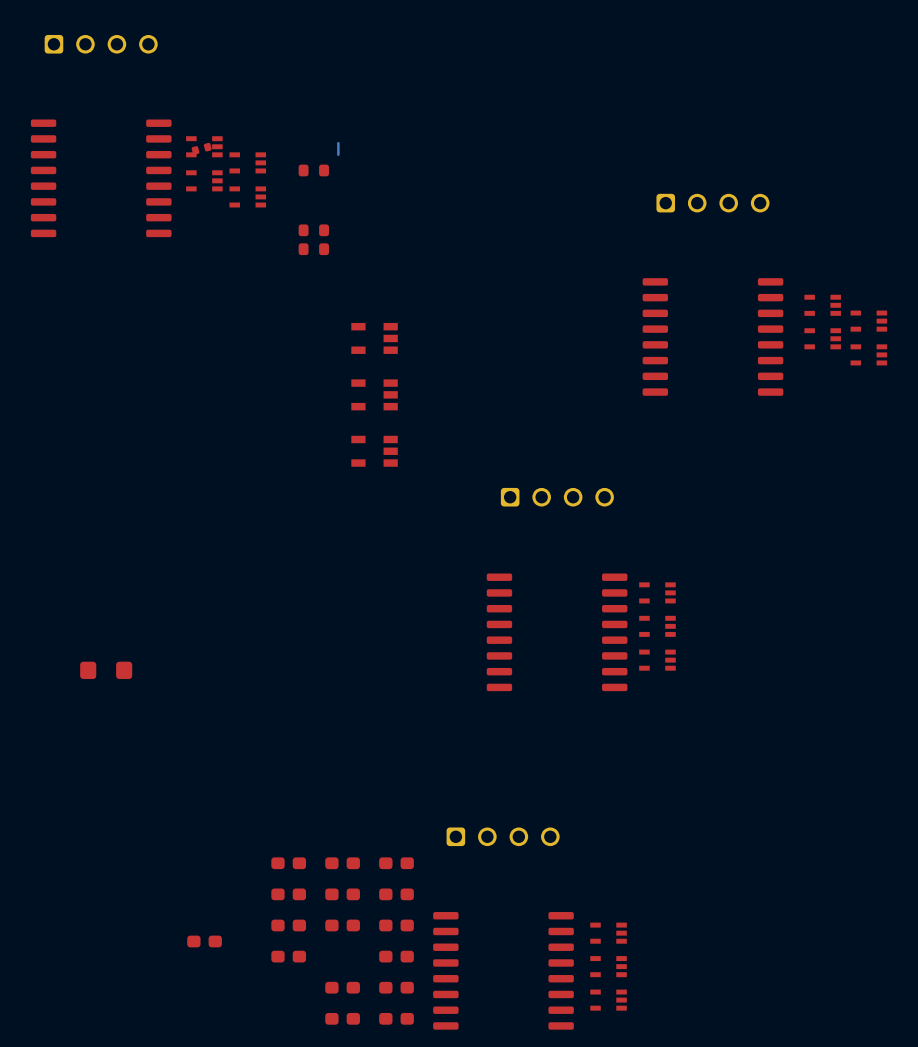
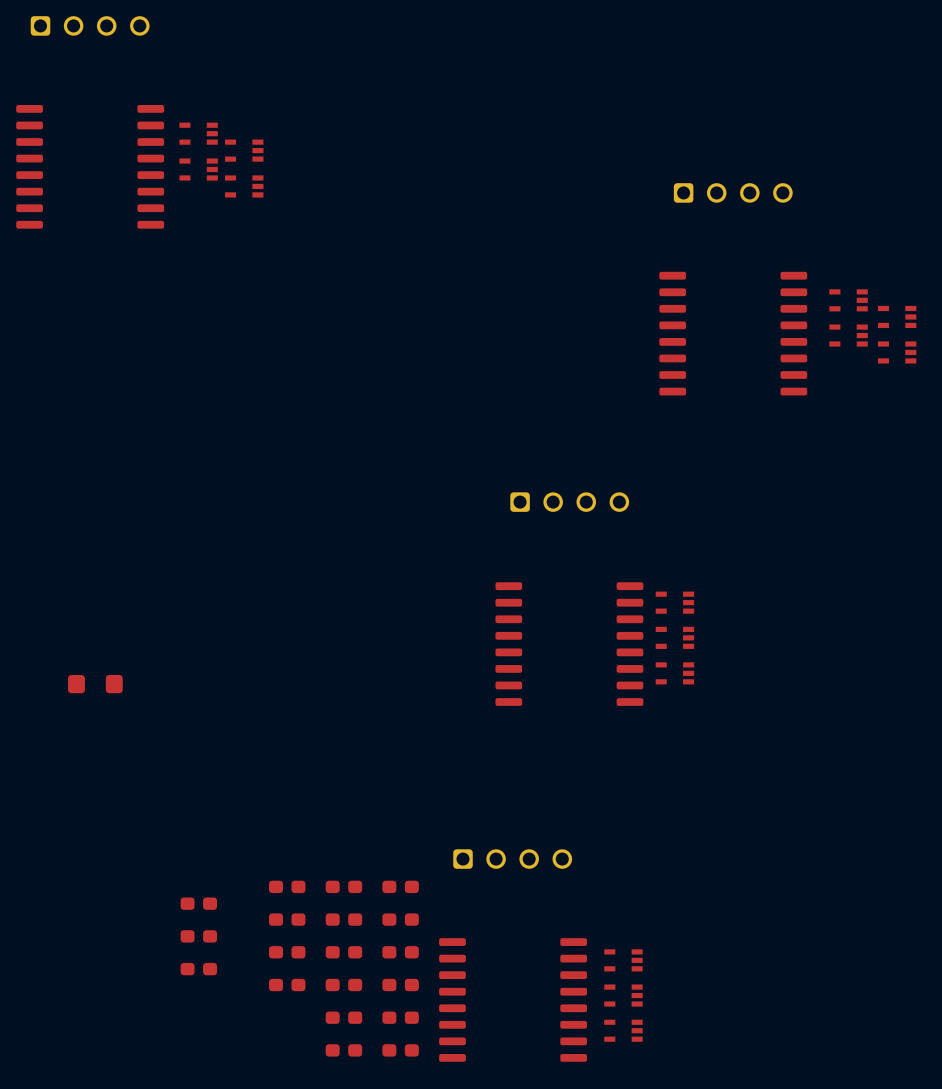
bottom track: (338, 143) (338, 154) -> none
part: (201, 148) -> none
part: (313, 170) -> none
part: (313, 230) -> none
part: (313, 249) -> none
part: (374, 338) -> none
part: (374, 394) -> none
part: (374, 451) -> none
part: none -> (198, 903)
part: none -> (198, 936)
part: none -> (343, 985)

